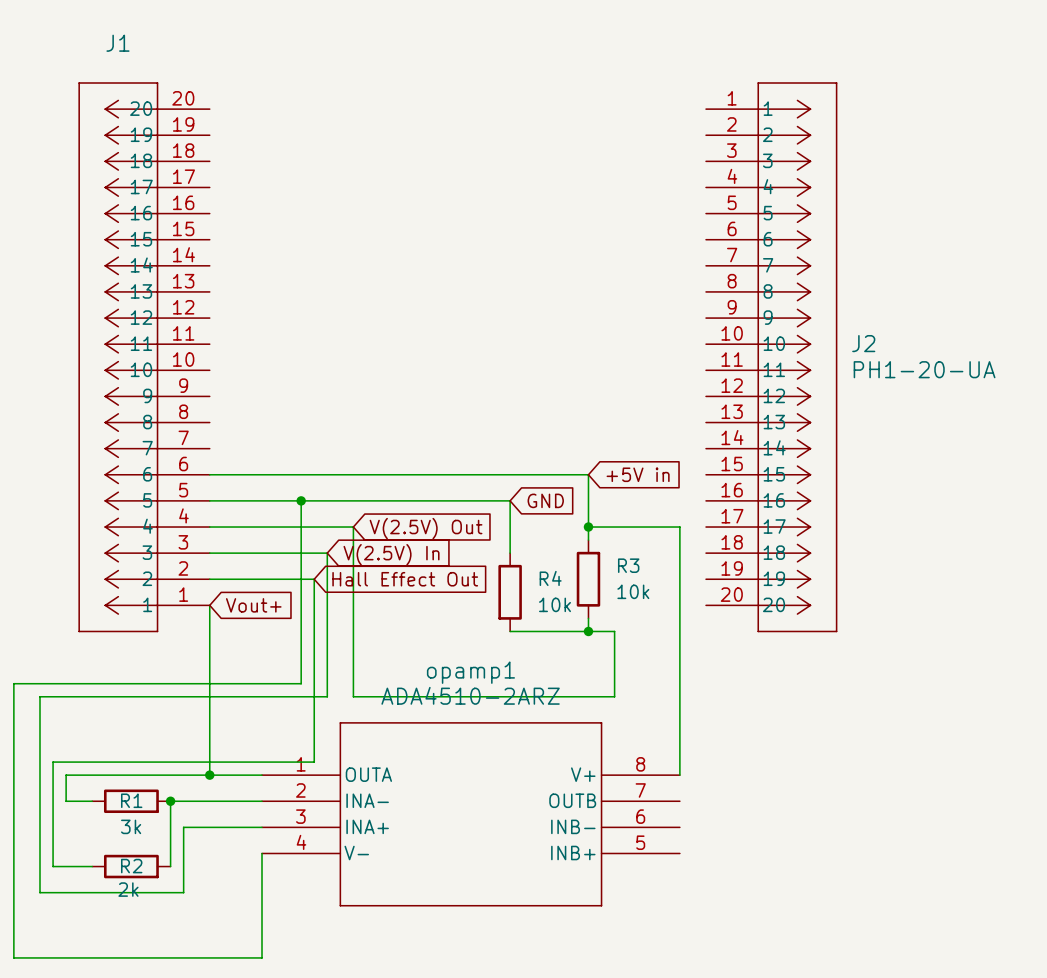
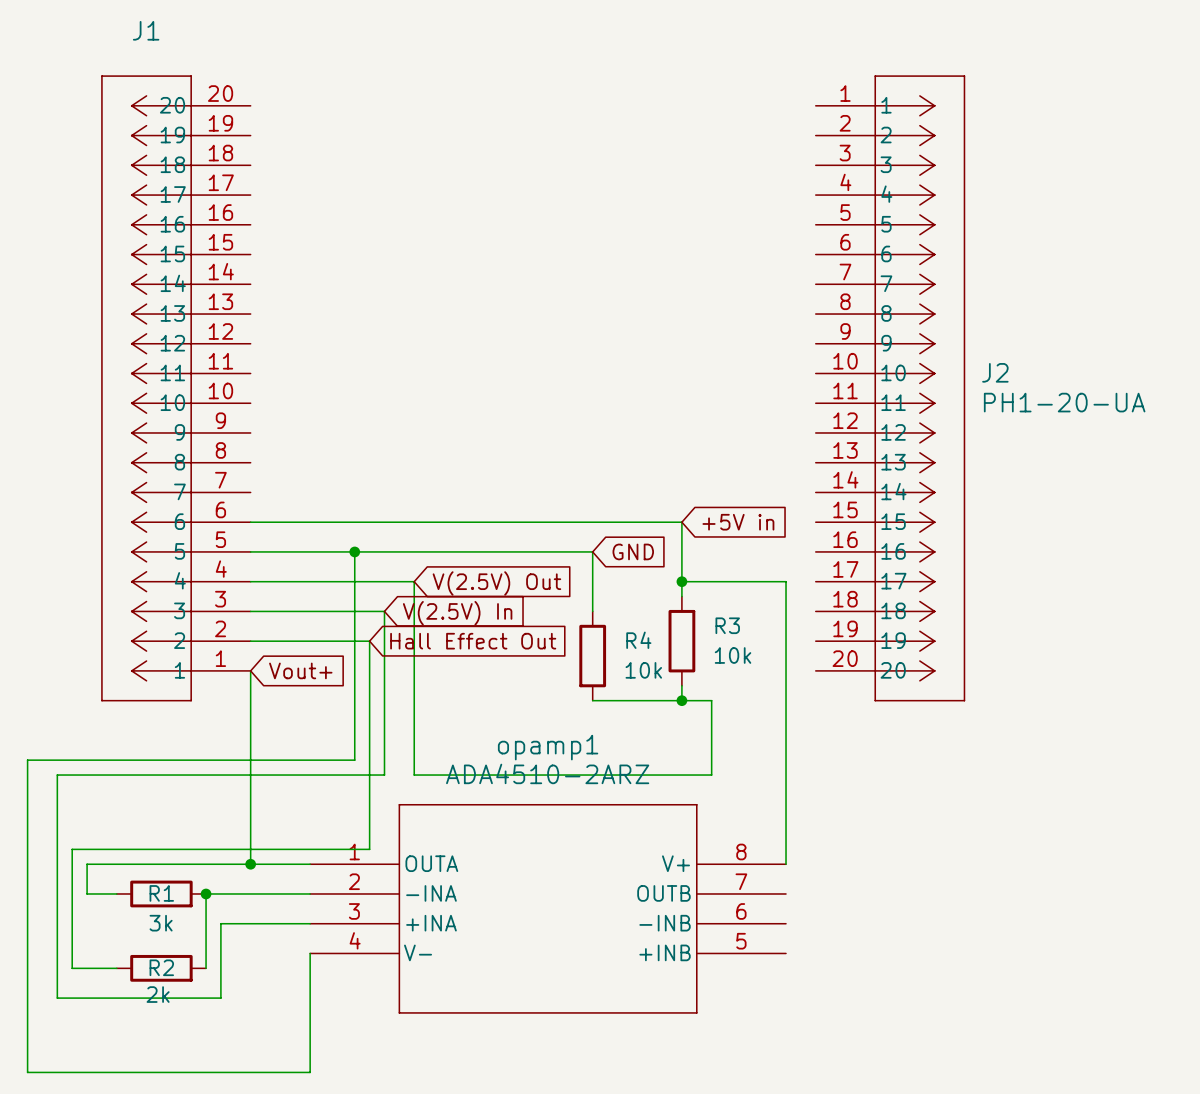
opamp1 pin name: INA- (367, 800) -> -INA (431, 893)
opamp1 pin name: INA+ (367, 826) -> +INA (431, 923)
opamp1 pin name: INB- (573, 826) -> -INB (665, 923)
opamp1 pin name: INB+ (573, 853) -> +INB (665, 952)

